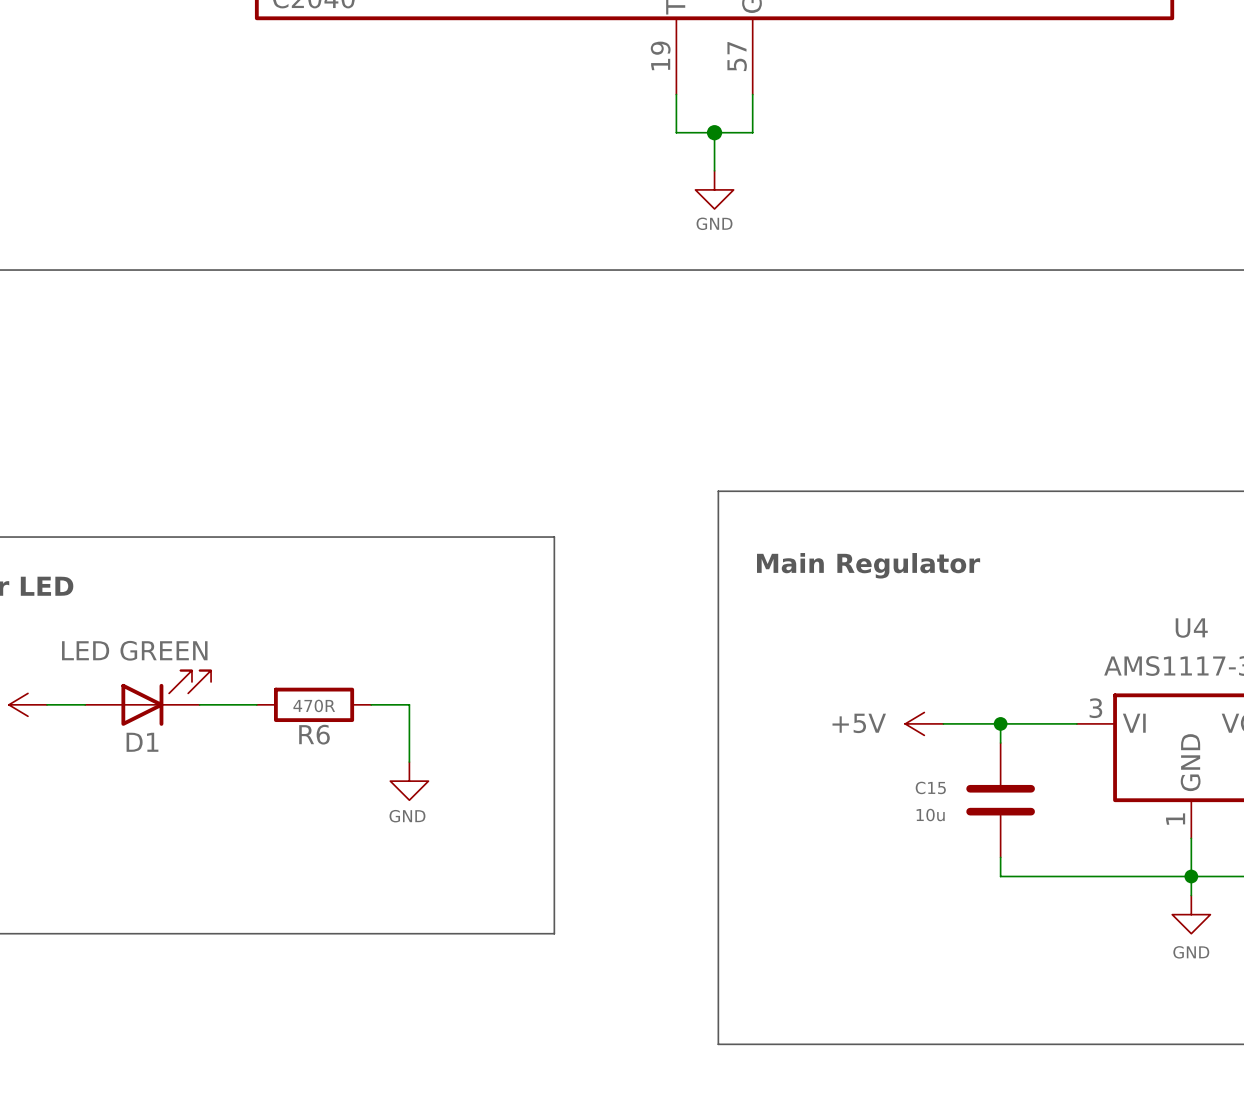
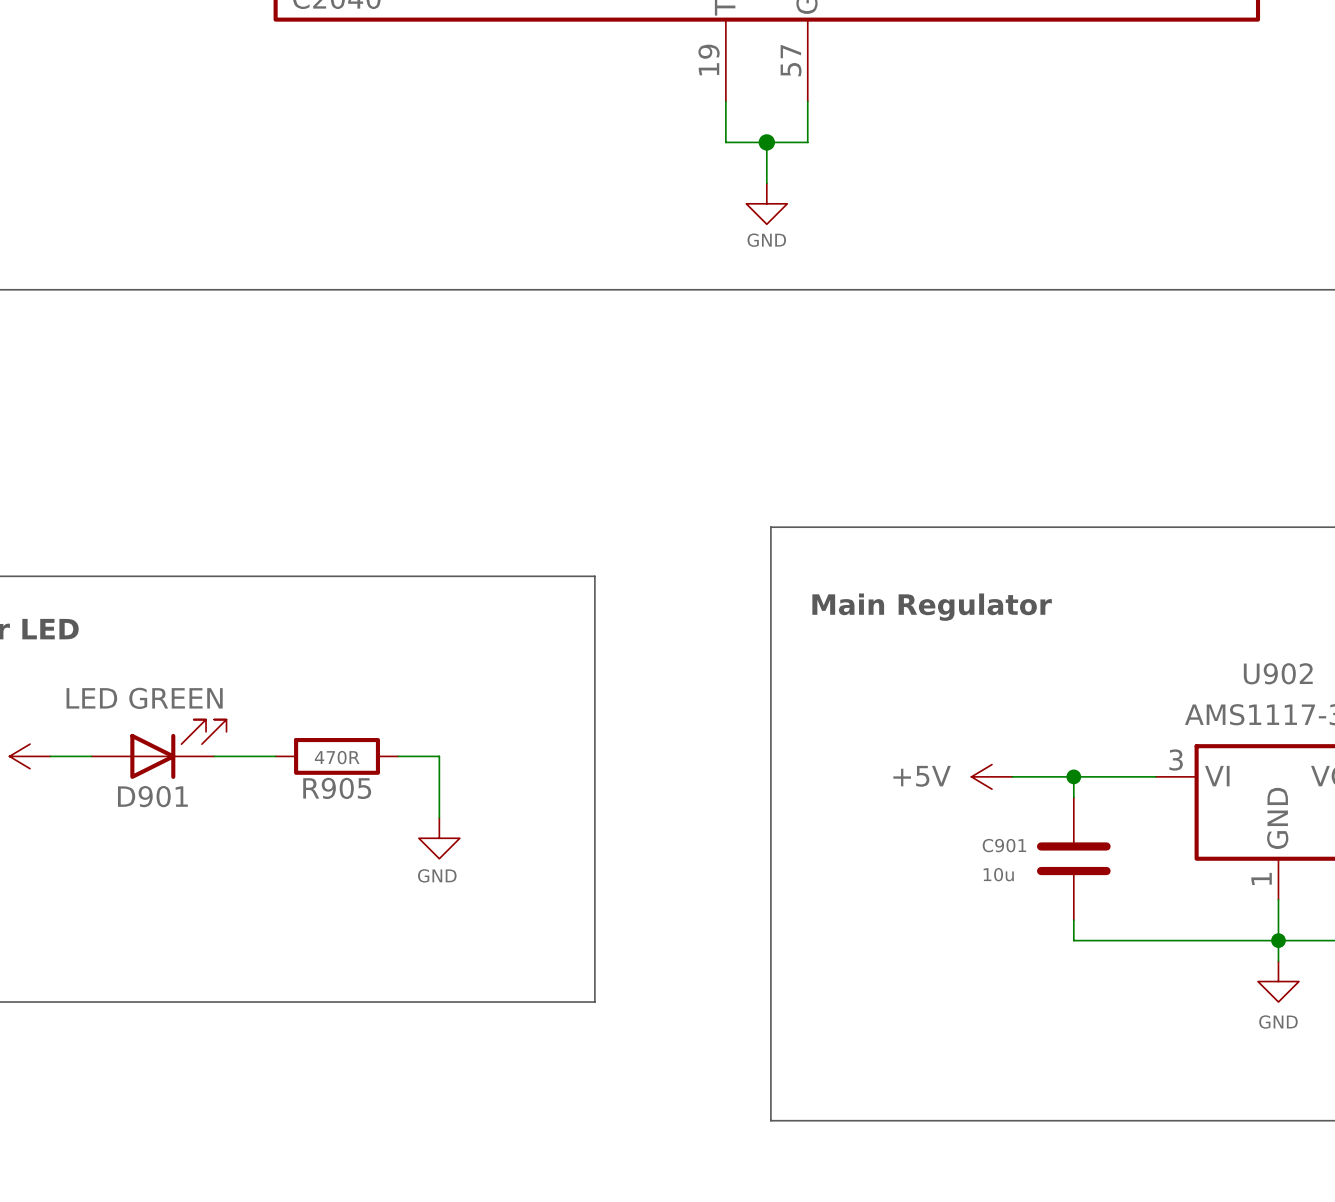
U4 name: U4 (1191, 628) -> U902 (1278, 673)
R6 name: R6 (314, 734) -> R905 (337, 788)
D1 name: D1 (142, 742) -> D901 (152, 796)
C15 name: C15 (930, 787) -> C901 (1004, 845)

